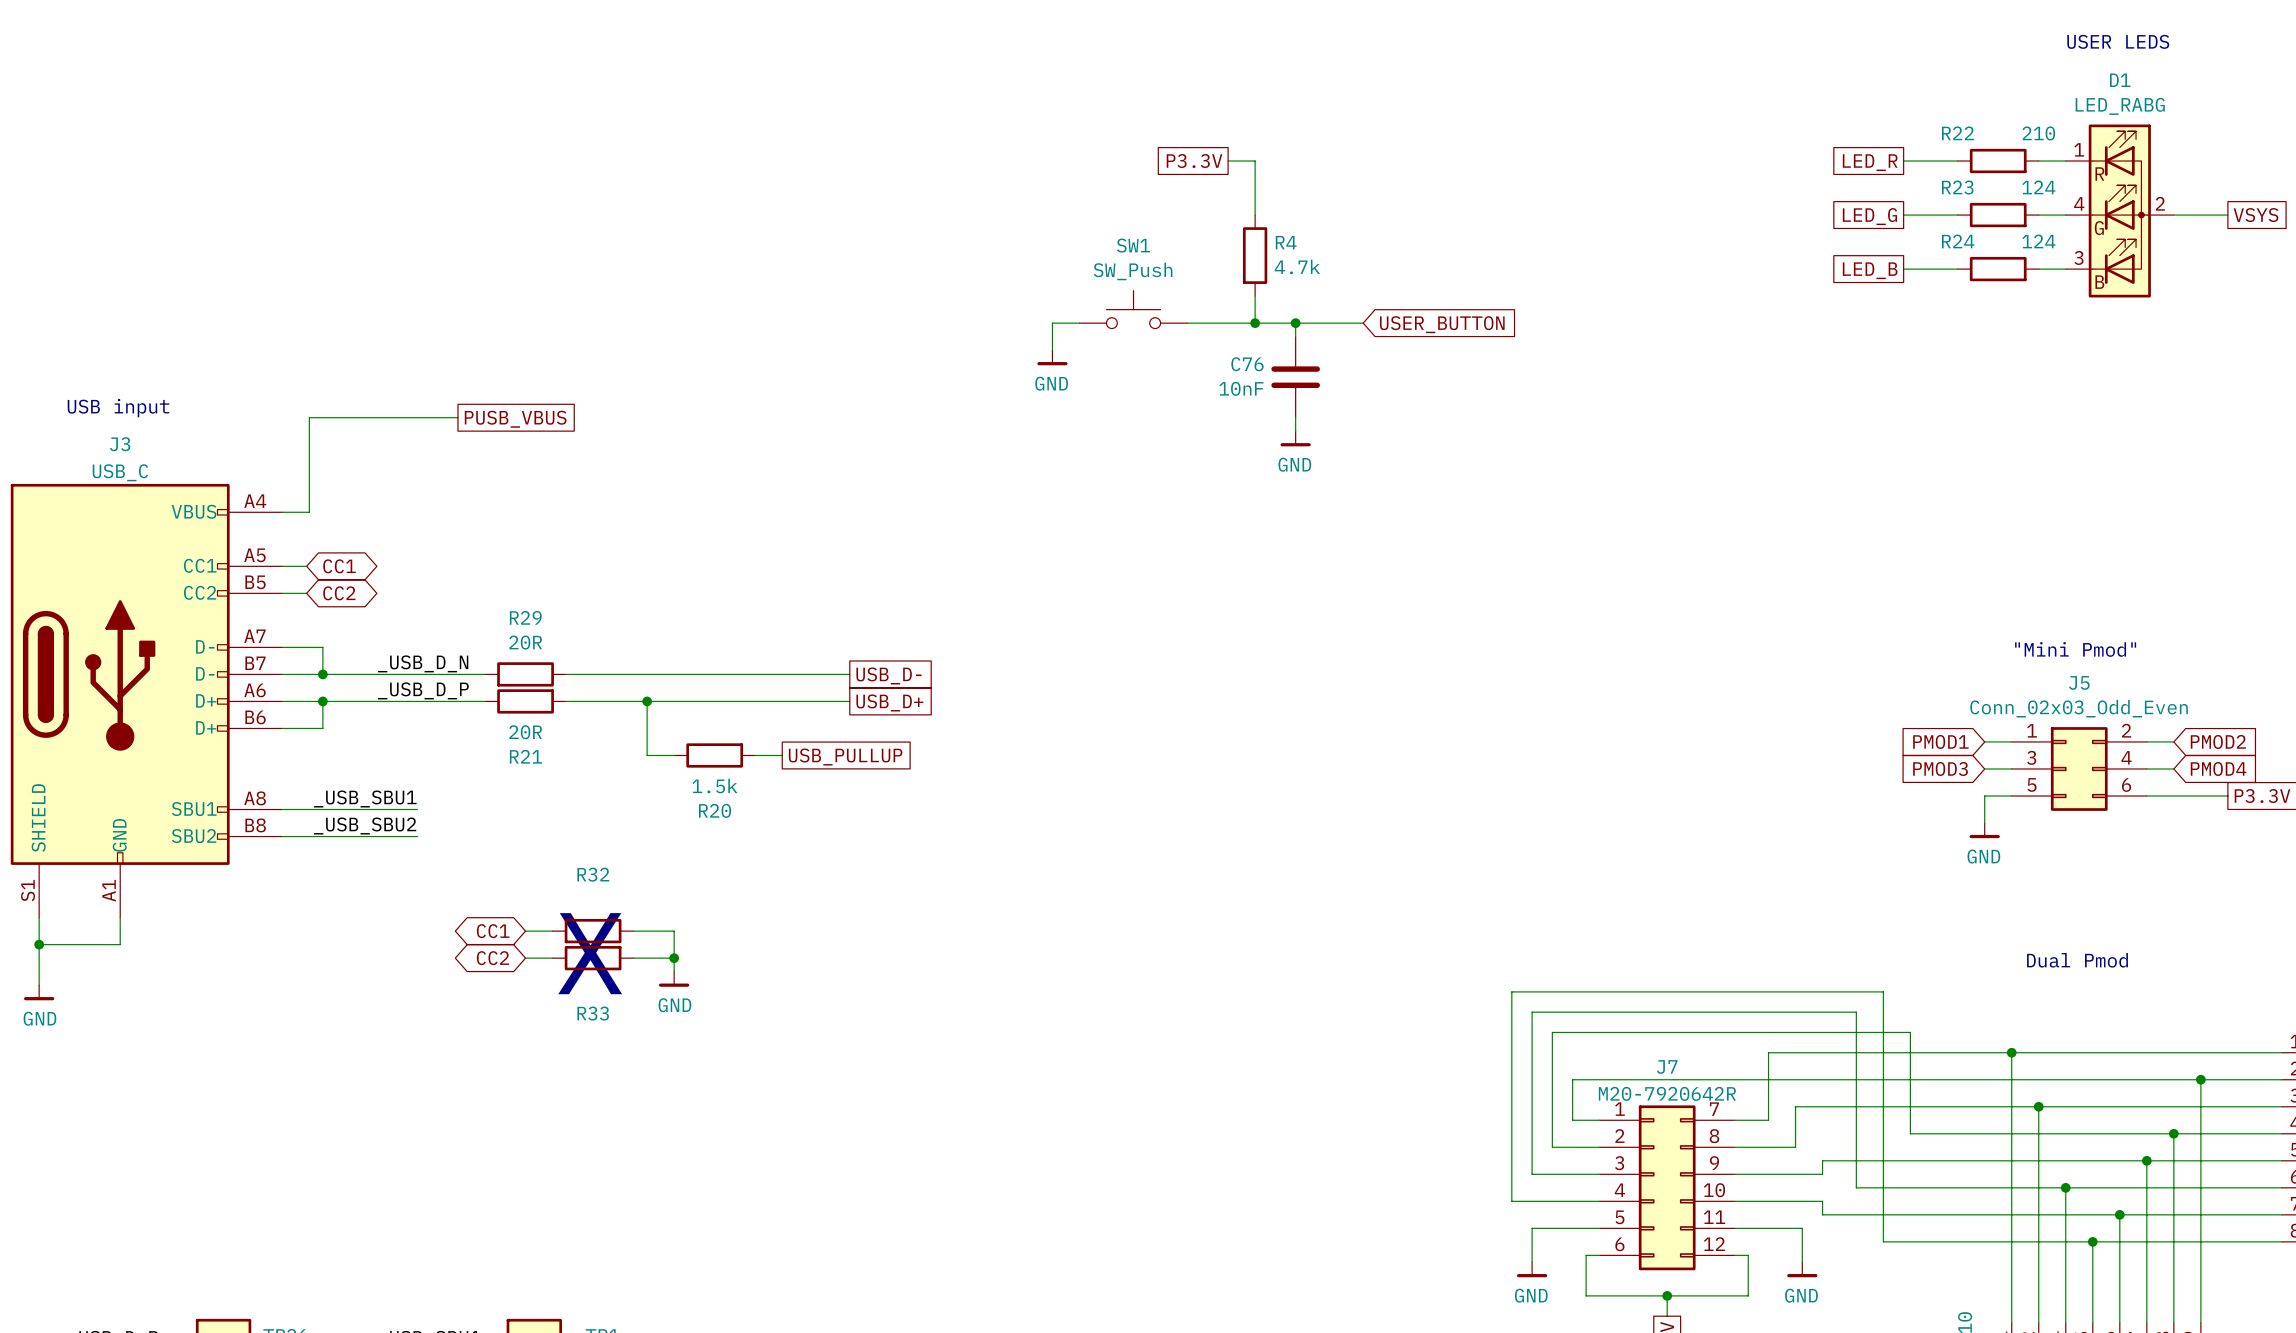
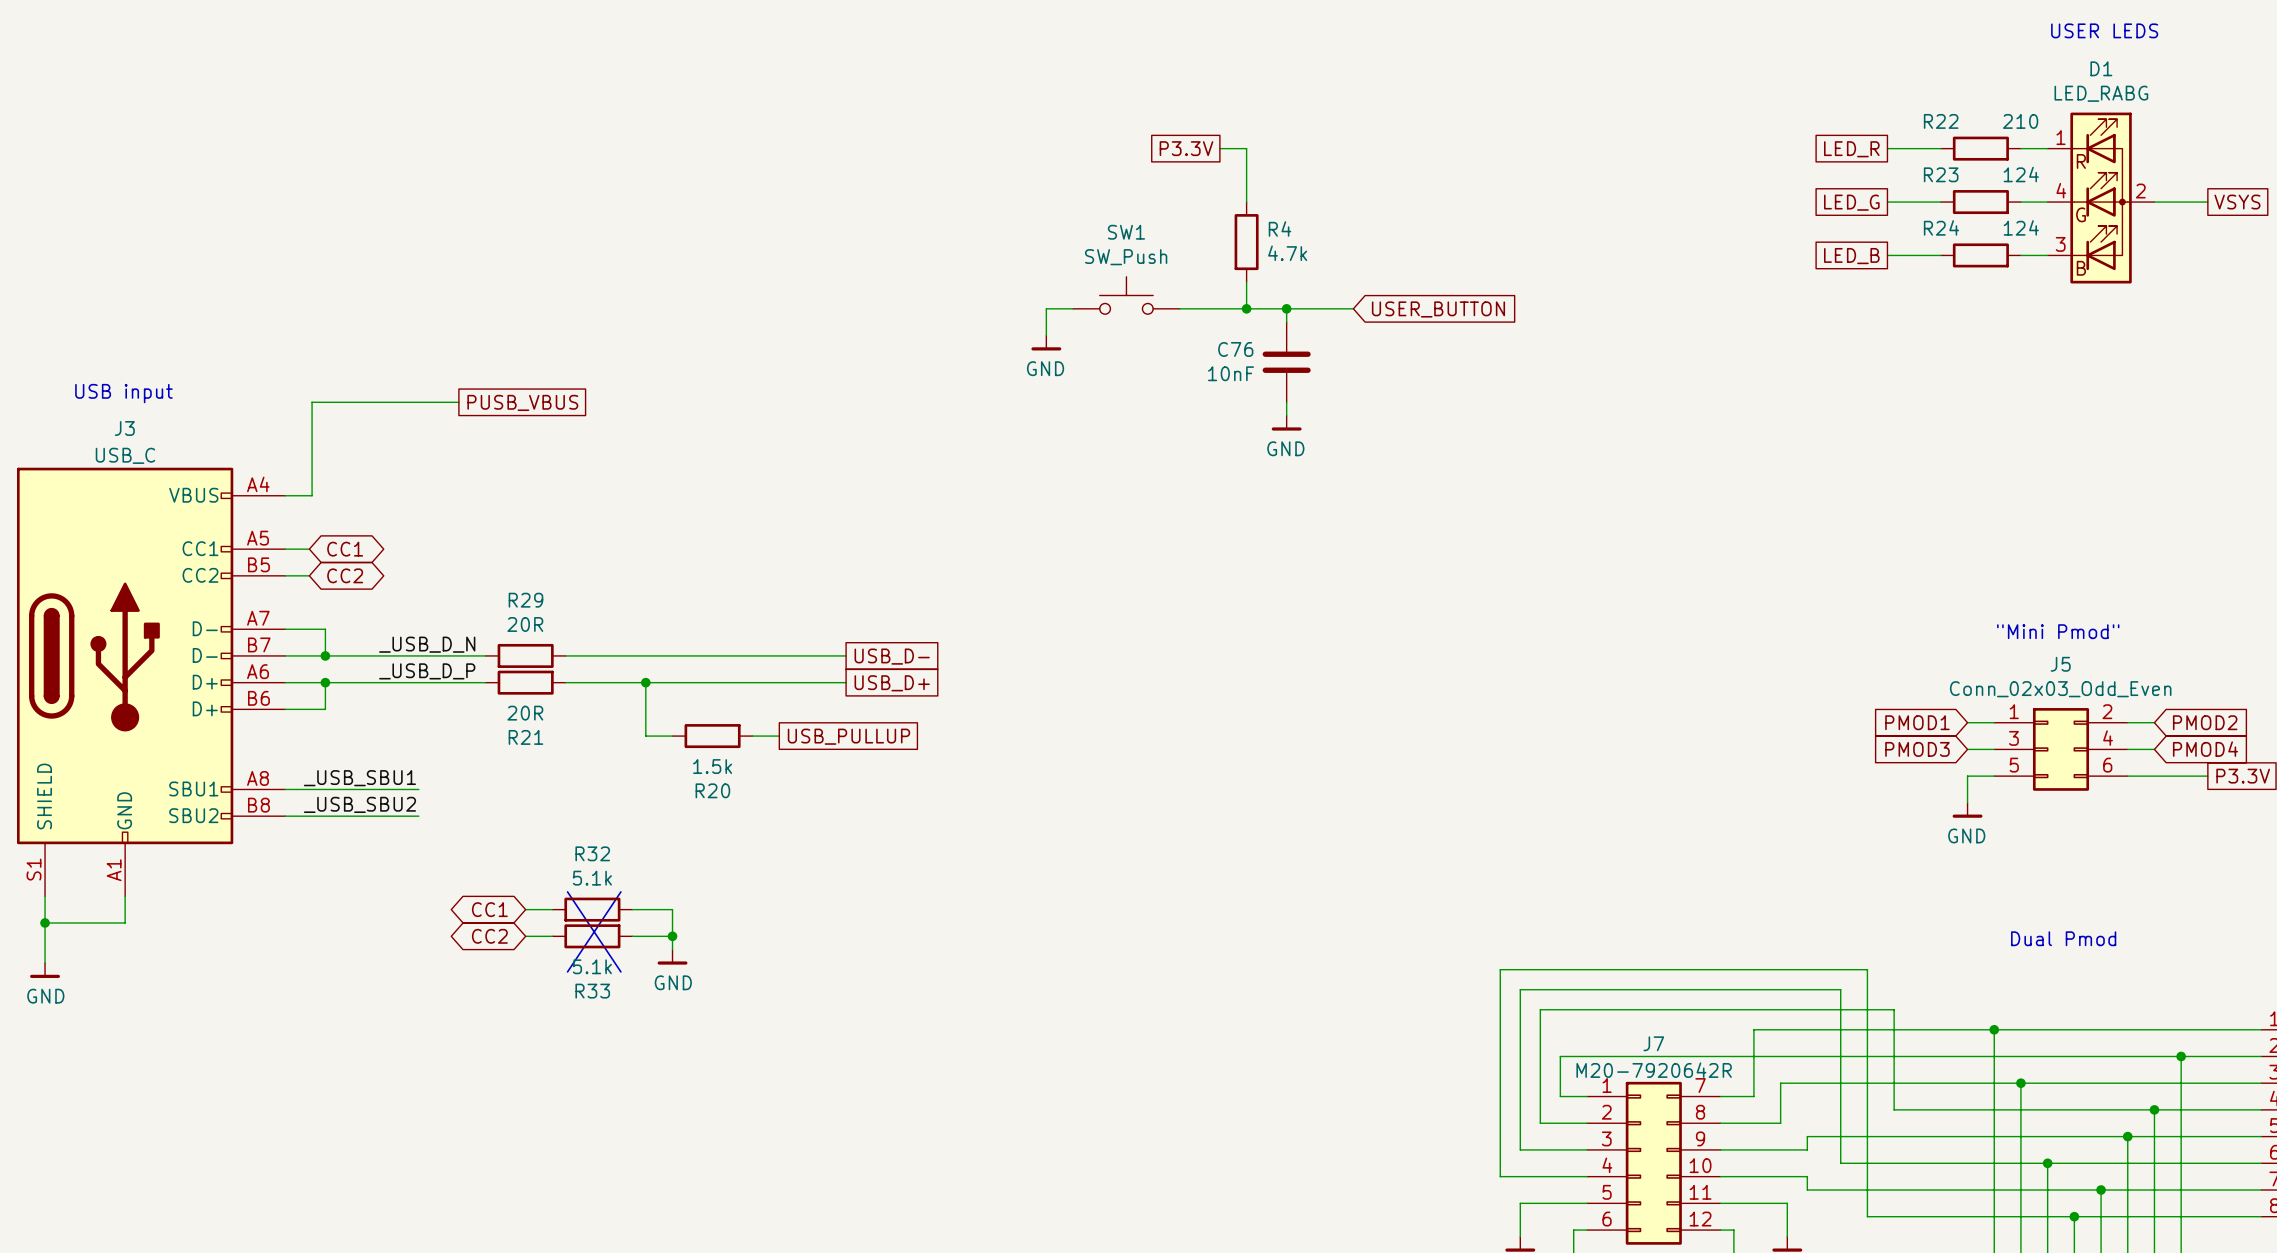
R32 value: none -> 5.1k (592, 878)
R33 value: none -> 5.1k (592, 966)

